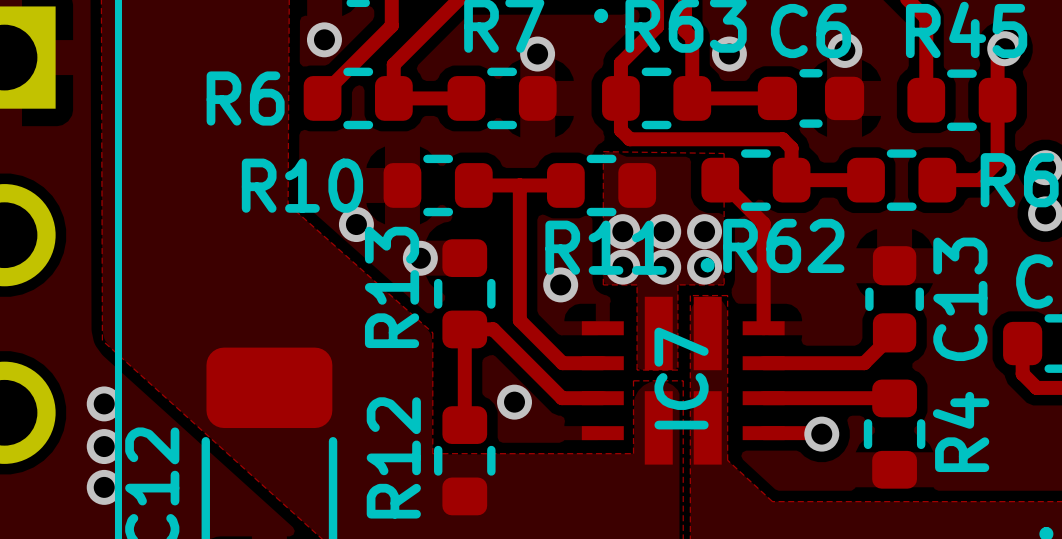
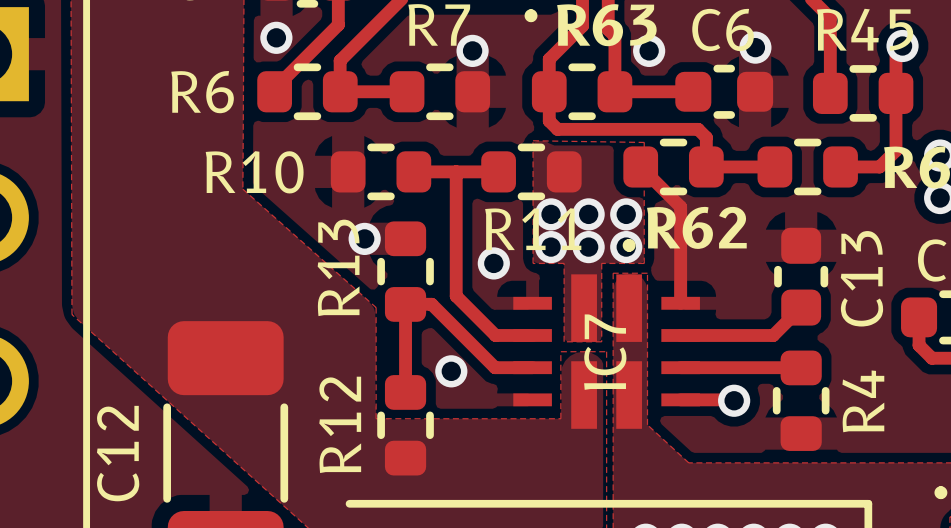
via: (356, 224) -> none
via: (104, 403) -> none
via: (104, 446) -> none
via: (104, 487) -> none

